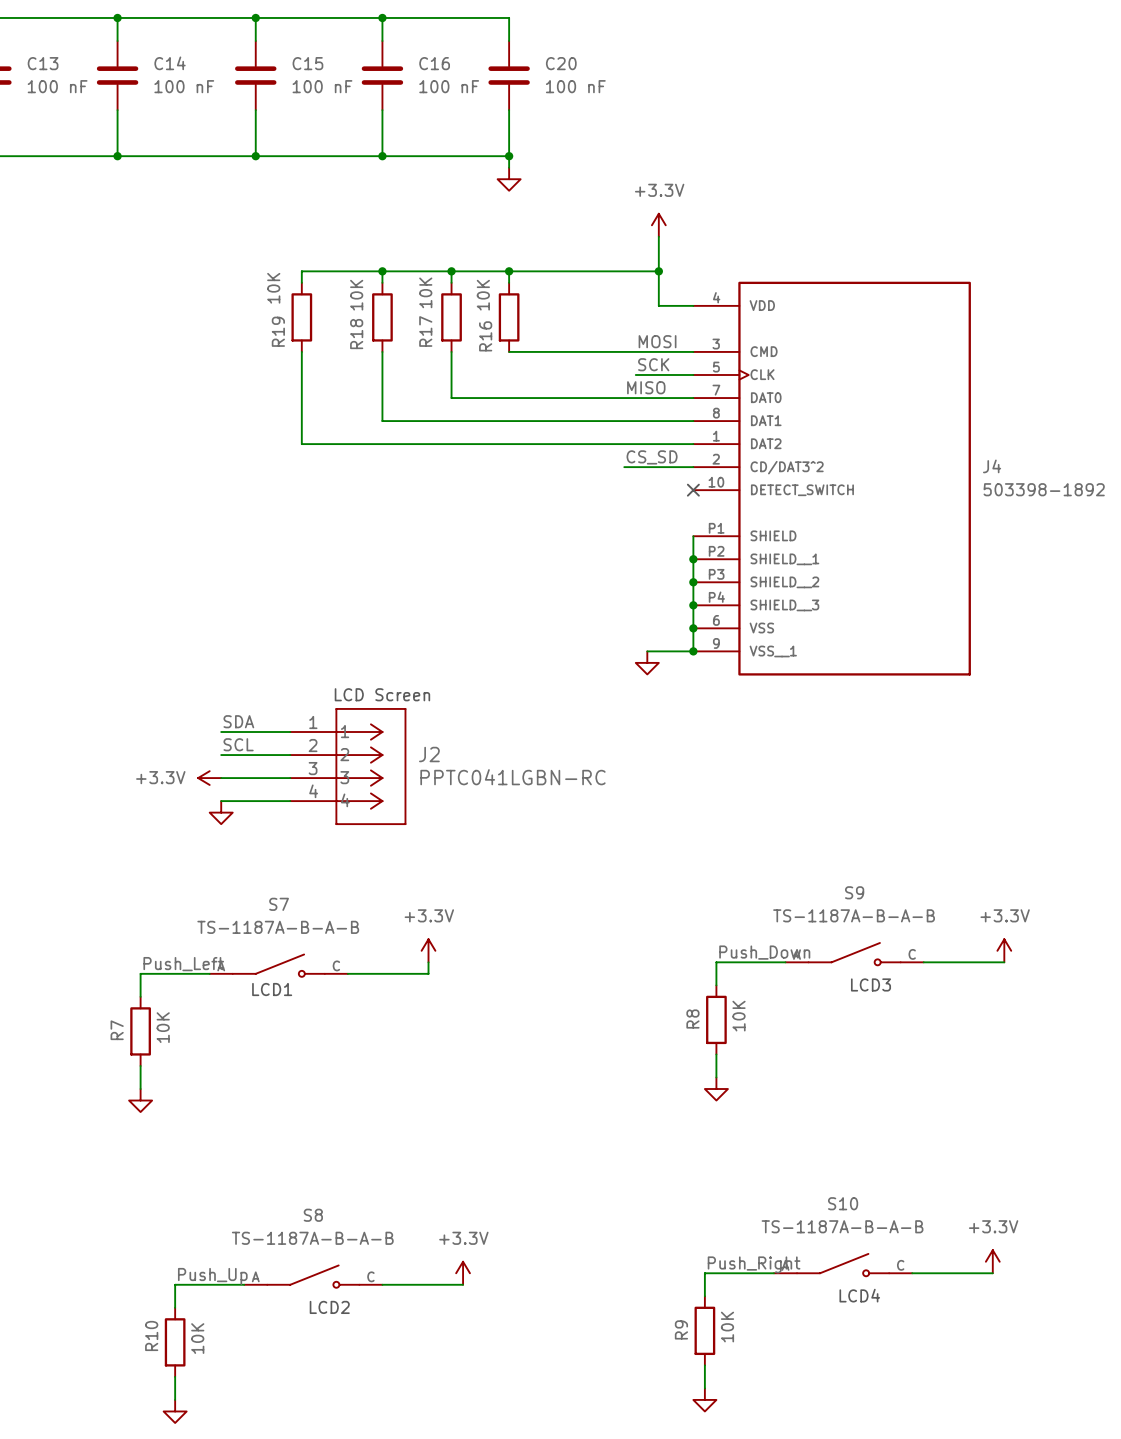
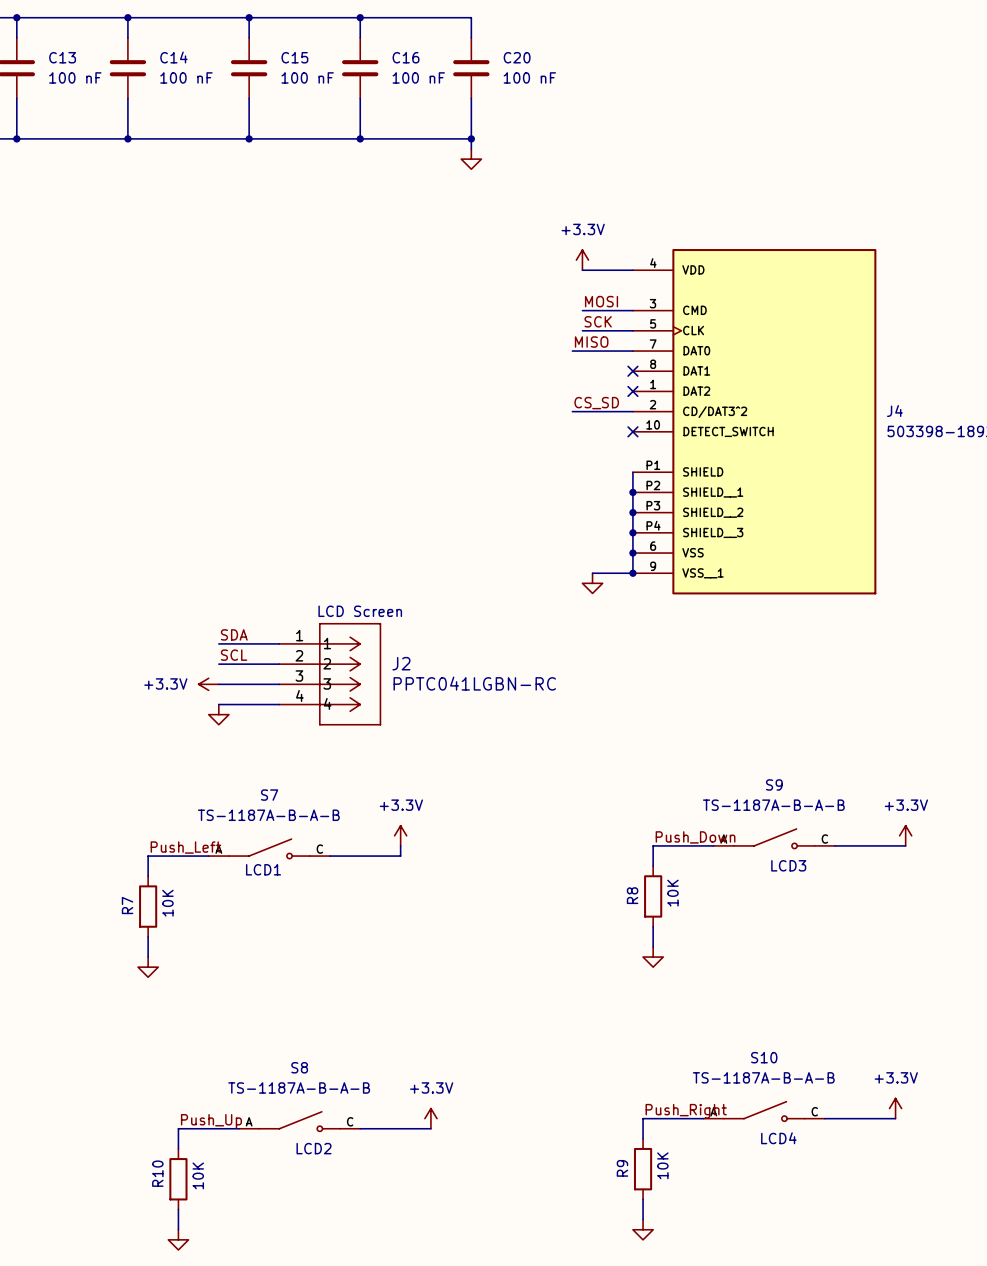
power symbol position: +3.3V (658, 225) -> +3.3V (582, 260)
wire: (658, 236) (658, 305) -> (582, 270) (602, 270)
wire: (382, 271) (382, 282) -> none
junction: (382, 271) -> none
wire: (451, 271) (451, 282) -> none
junction: (451, 271) -> none
wire: (509, 271) (509, 282) -> none
junction: (509, 271) -> none
wire: (658, 271) (301, 271) (301, 282) -> none
junction: (658, 271) -> none
R19: 10K (301, 317) -> none
R18: 10K (382, 317) -> none
R17: 10K (451, 317) -> none
R16: 10K (509, 317) -> none
wire: (301, 351) (301, 444) (693, 444) -> none
wire: (382, 351) (382, 421) (693, 421) -> none
wire: (451, 351) (451, 398) (624, 398) -> none
wire: (509, 351) (635, 351) -> none
no-connect mark: none -> (632, 371)
no-connect mark: none -> (632, 391)

